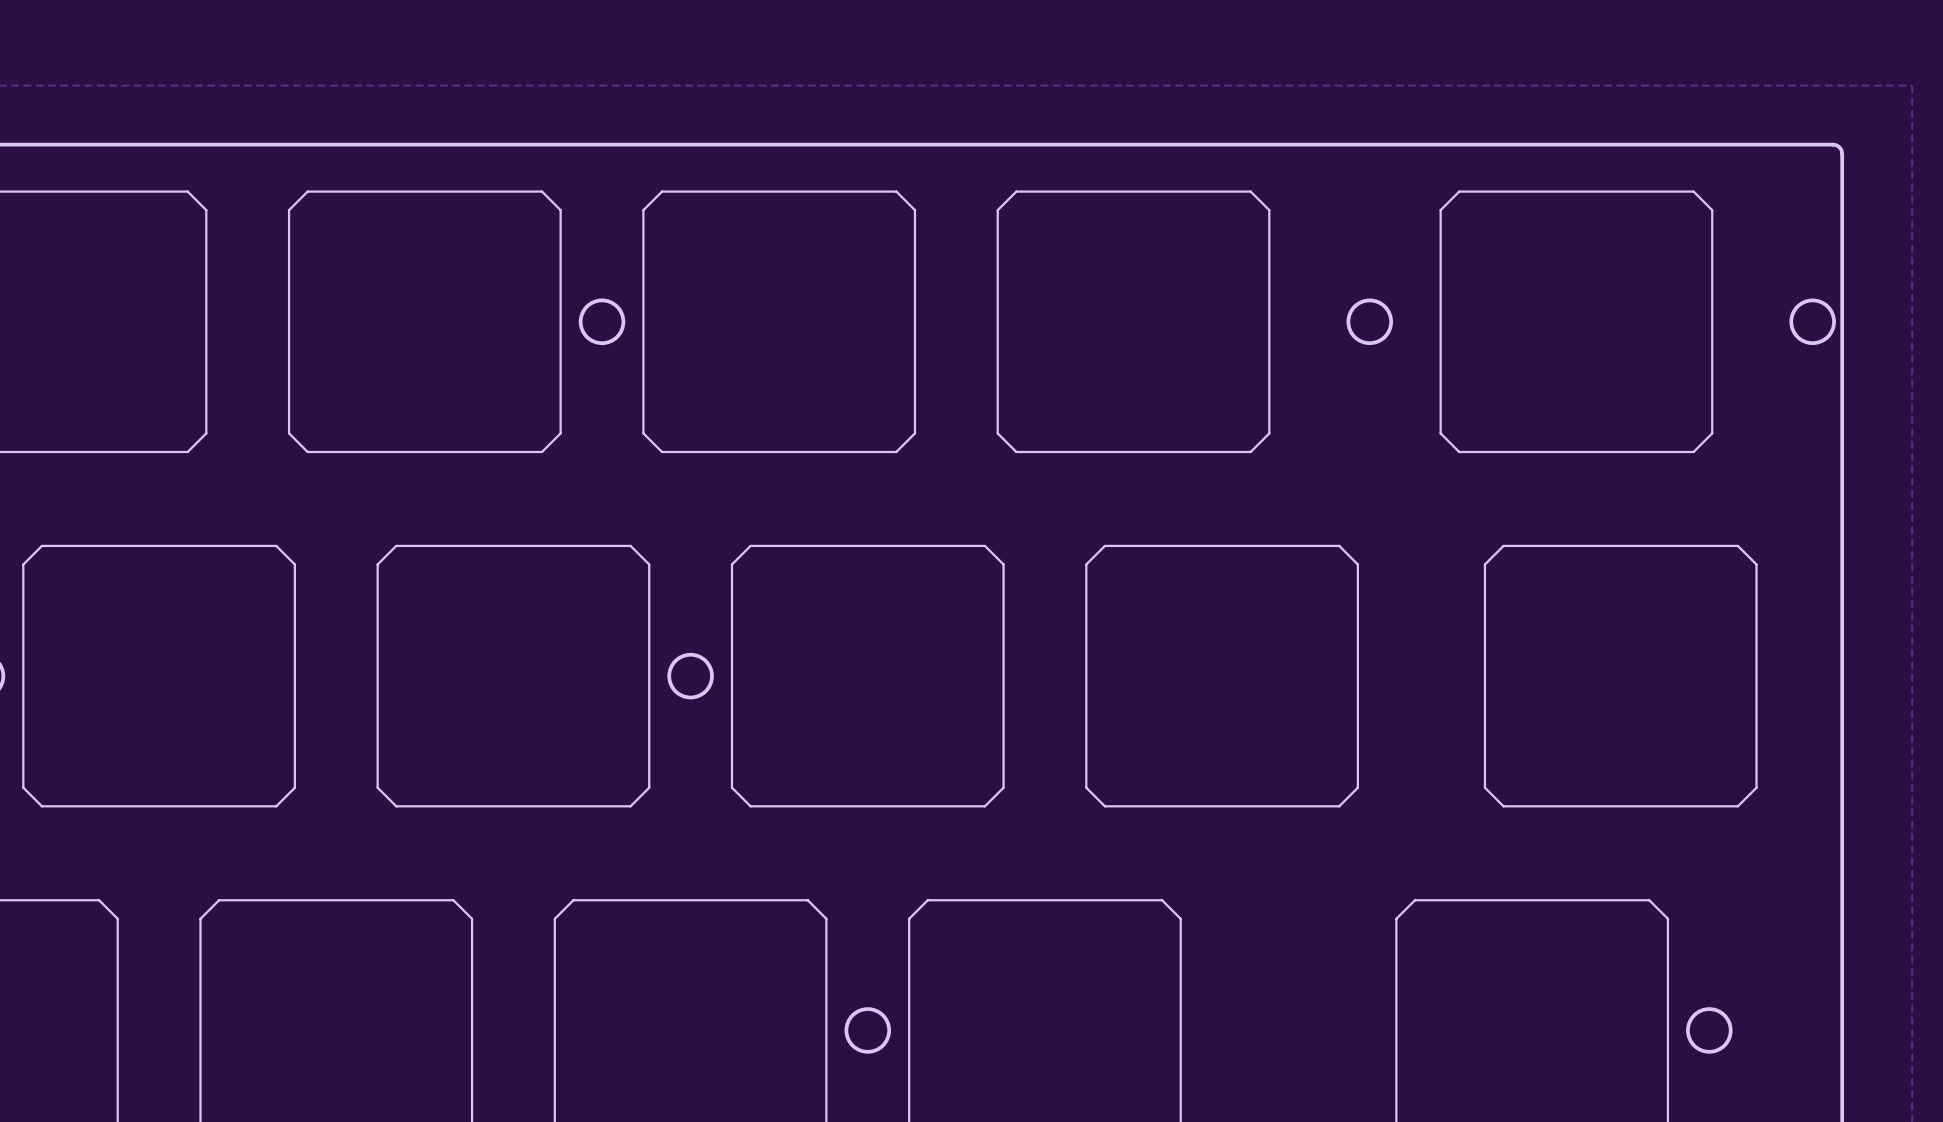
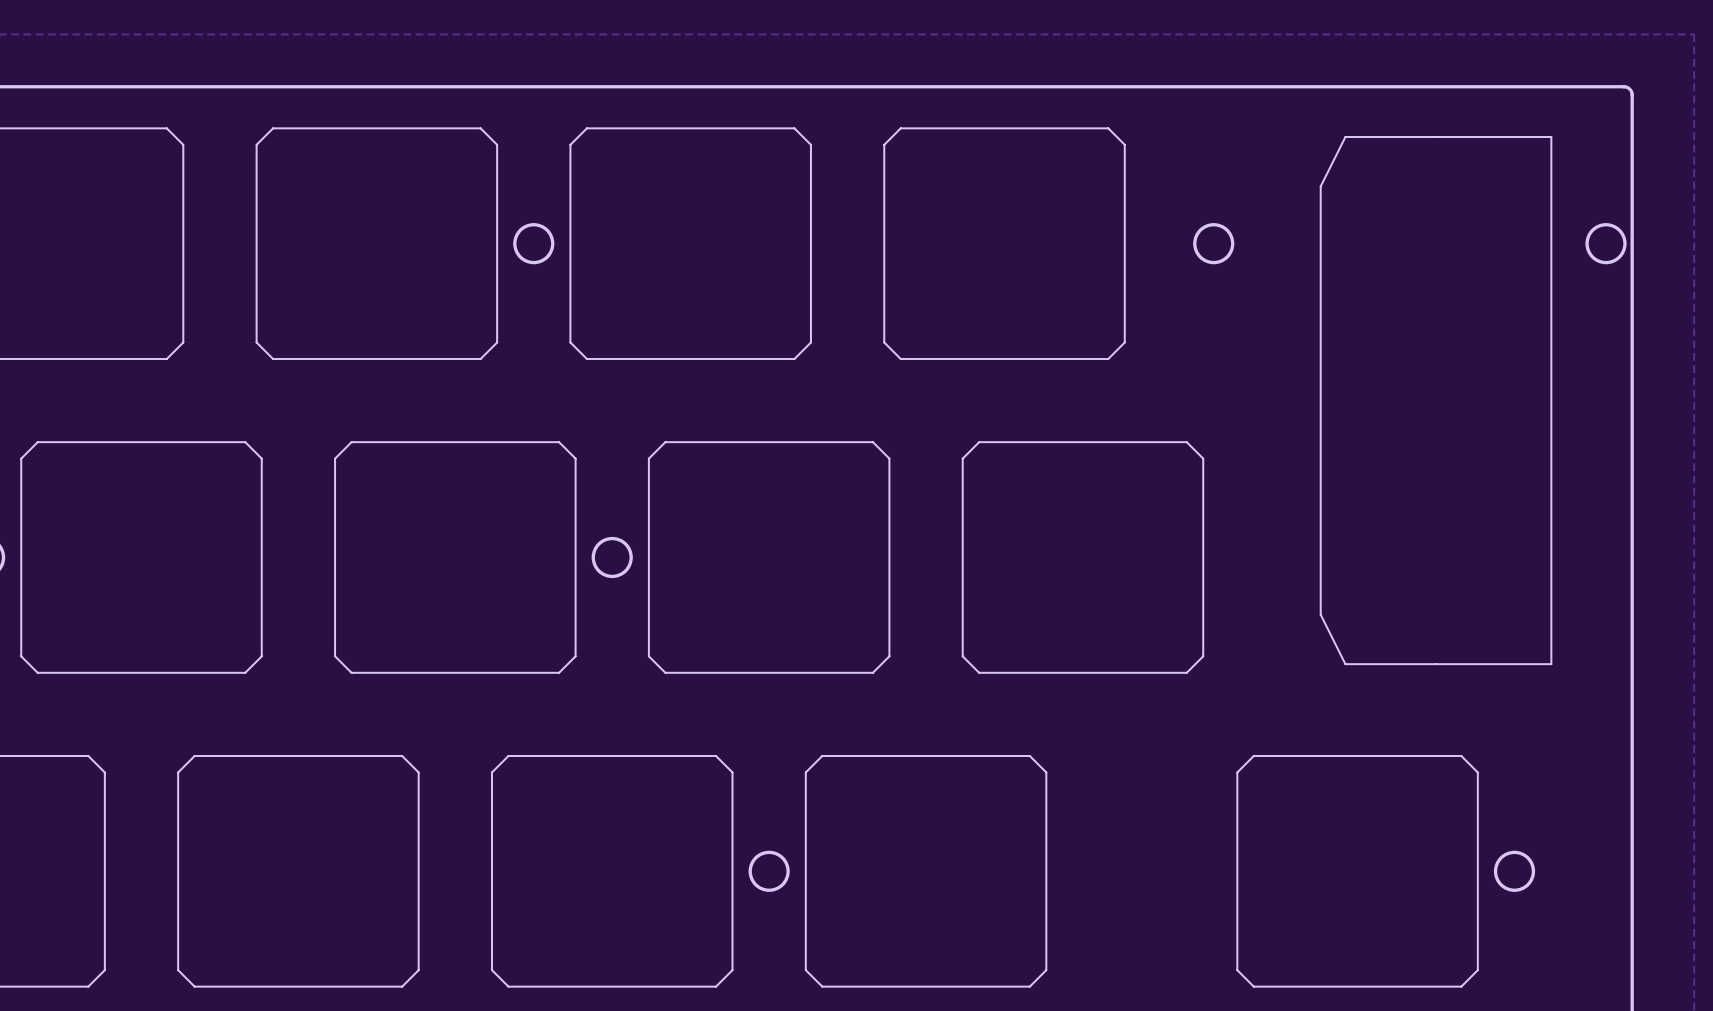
drawing: [1439, 190, 1714, 454] -> none
drawing: none -> [1319, 136, 1553, 666]
drawing: [1483, 544, 1758, 808] -> none

